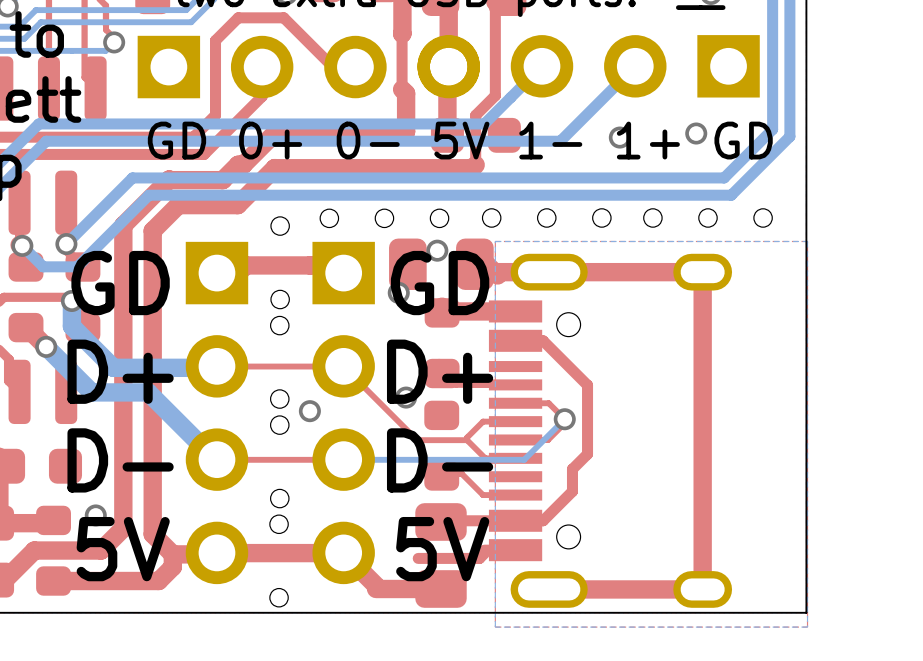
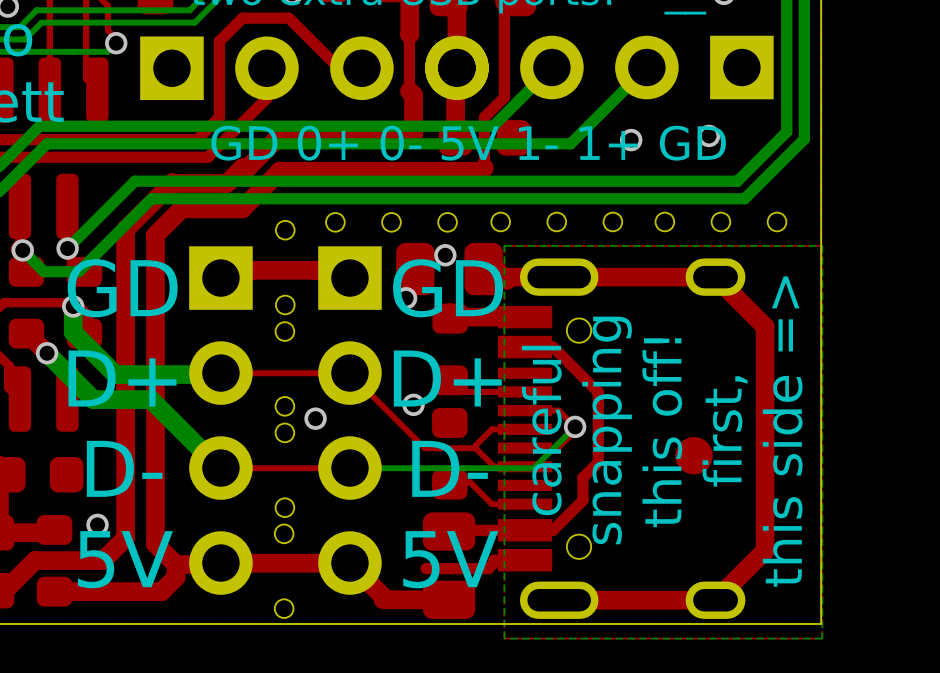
top track: (702, 272) (702, 589) -> (715, 277) (765, 326) (765, 550) (715, 600)
text: none -> careful (541, 430)
text: none -> snapping (607, 430)
text: none -> this off! (662, 432)
text: none -> first, (725, 431)
text: none -> this side => (782, 431)
part: none -> (694, 455)

